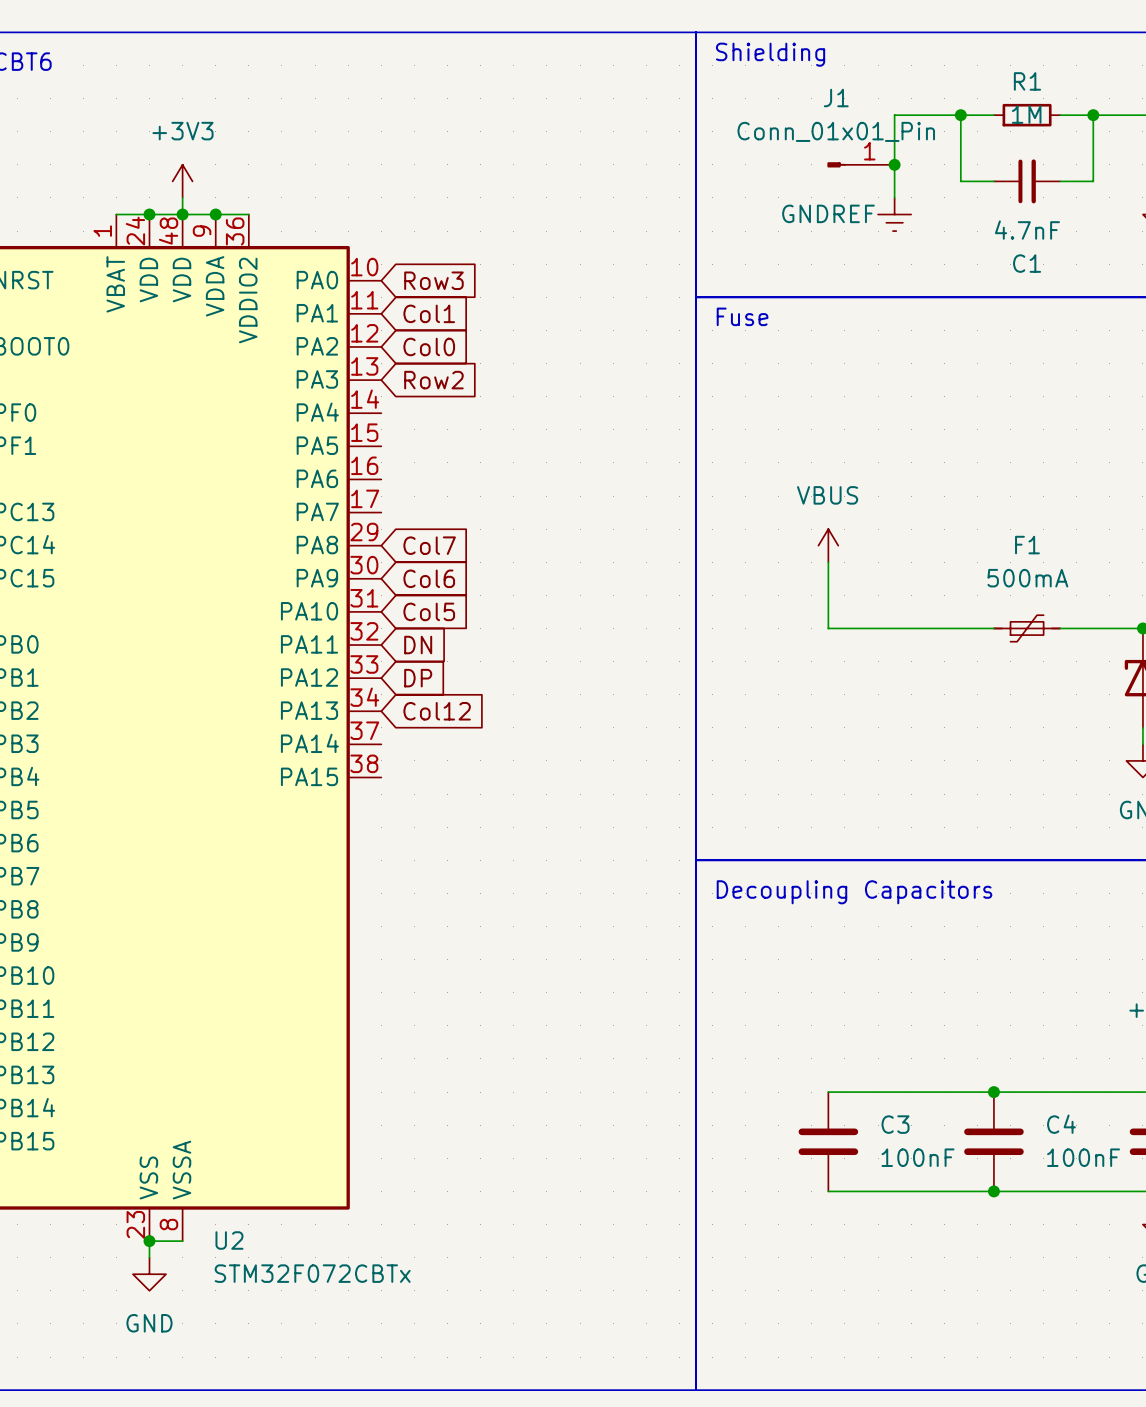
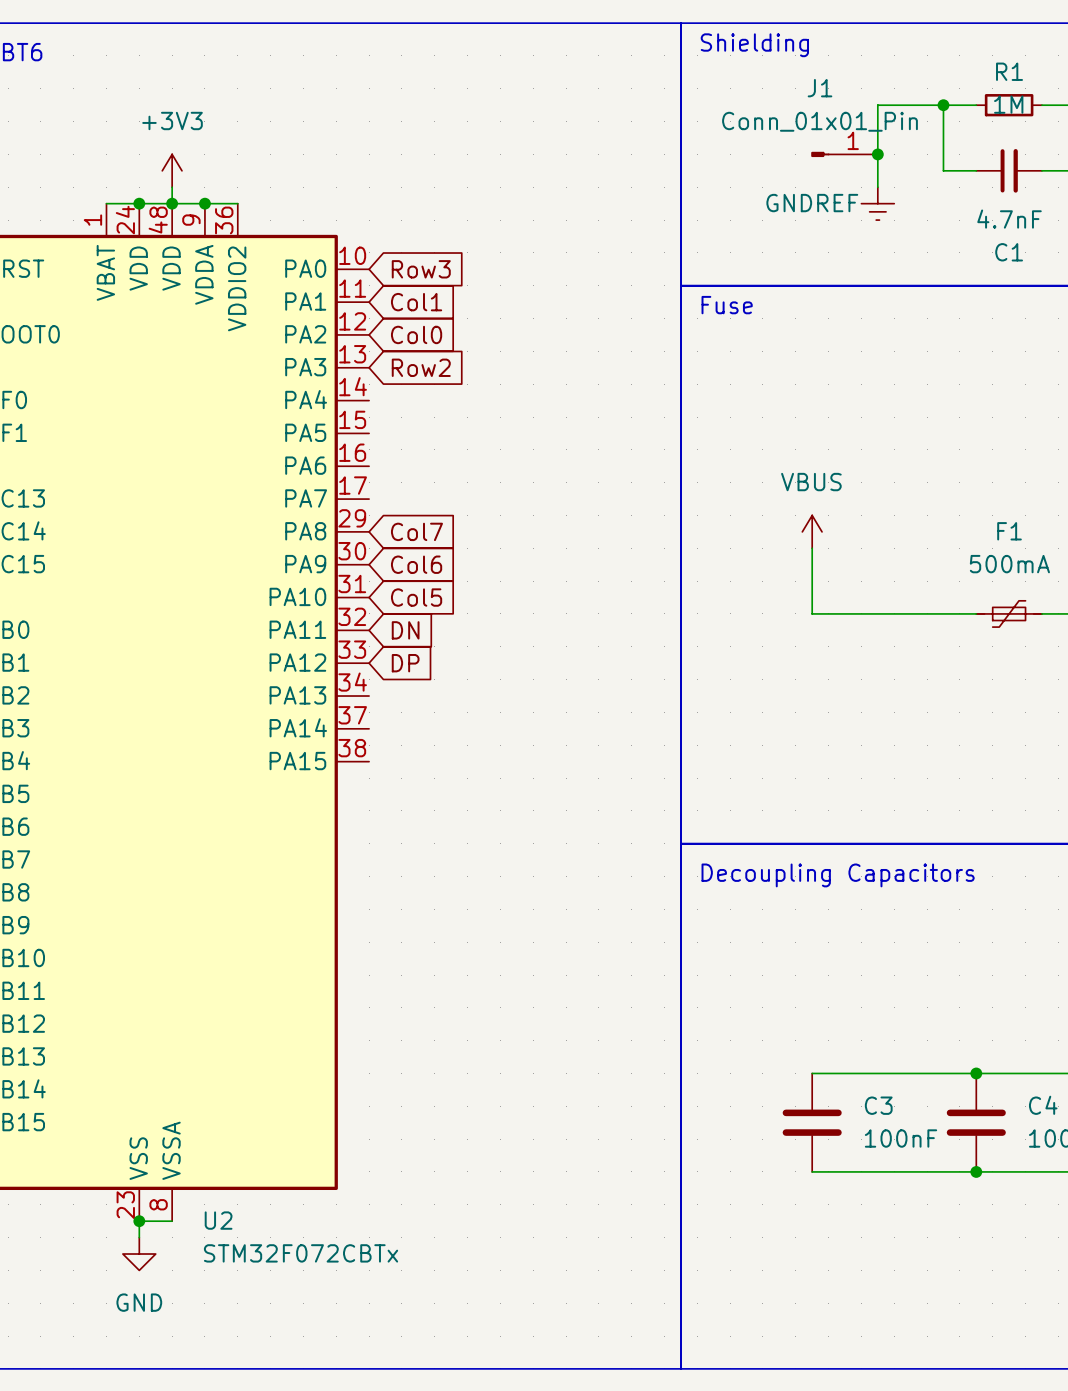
global label: Col12 (437, 711) -> none

